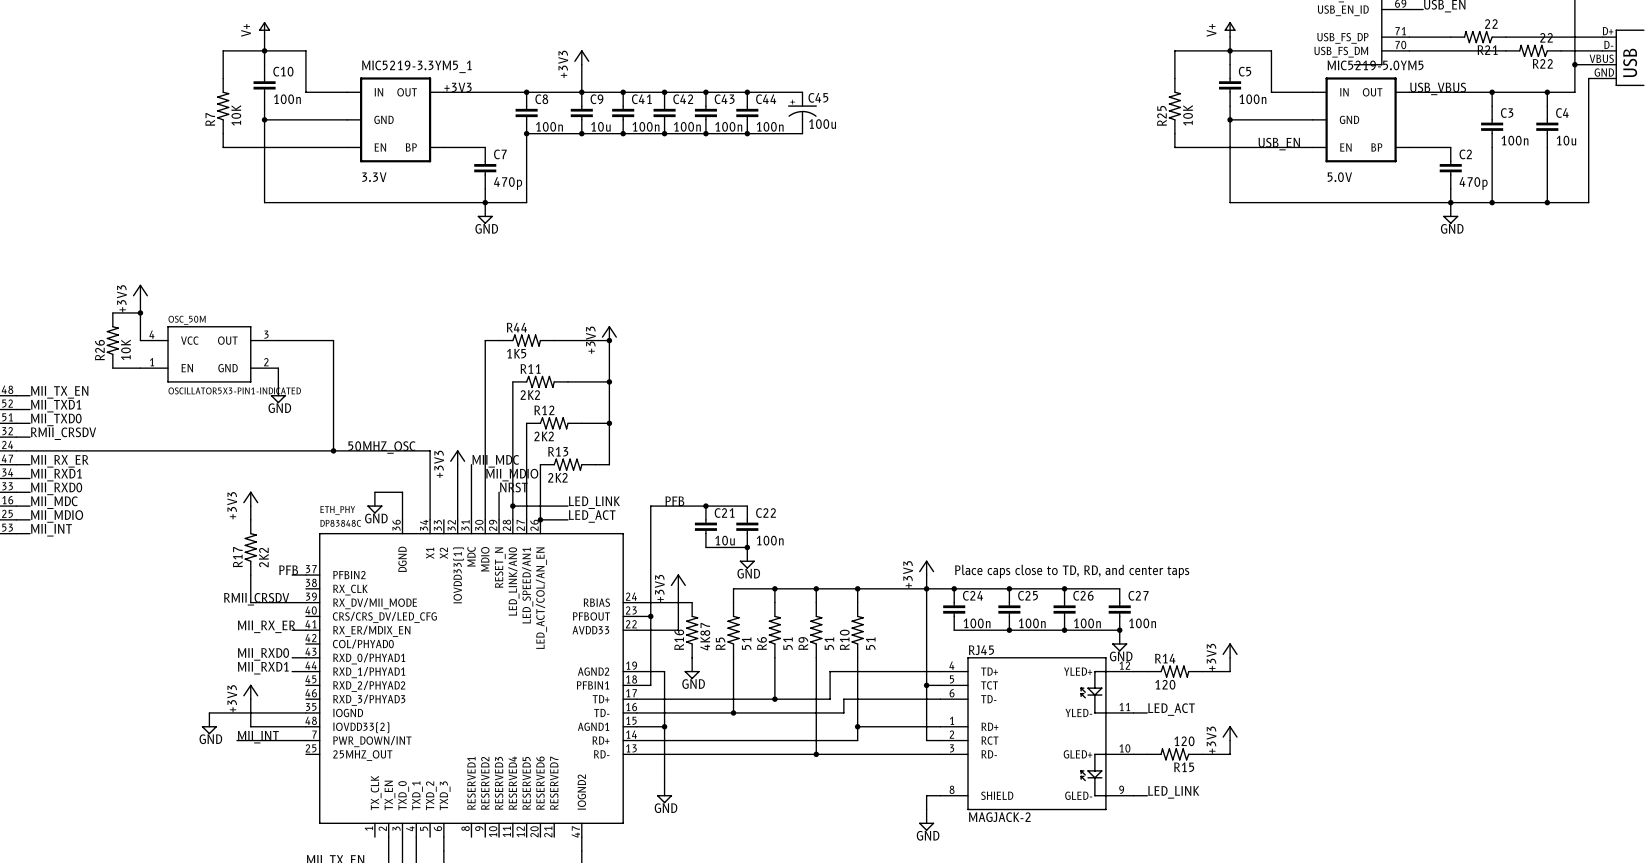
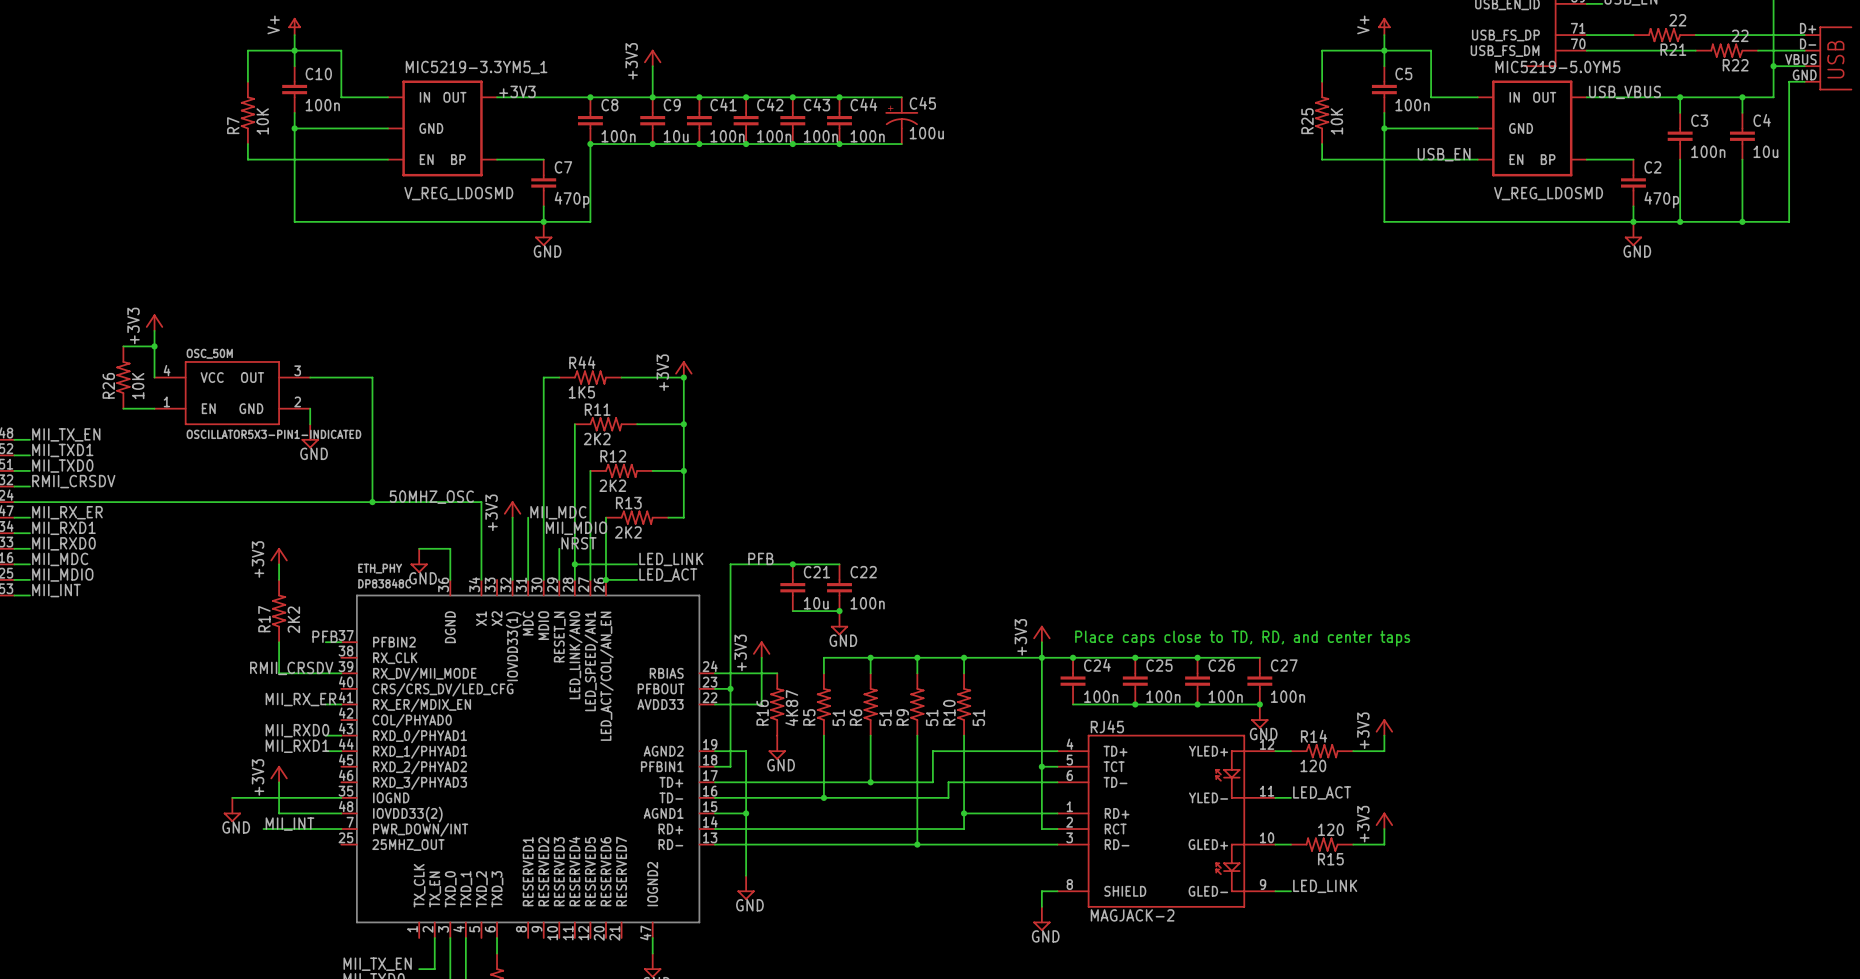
MIC5219-3.3YM5_1 value: 3.3V (374, 177) -> V_REG_LDOSMD (458, 193)
MIC5219-5.0YM5 value: 5.0V (1339, 177) -> V_REG_LDOSMD (1548, 193)

